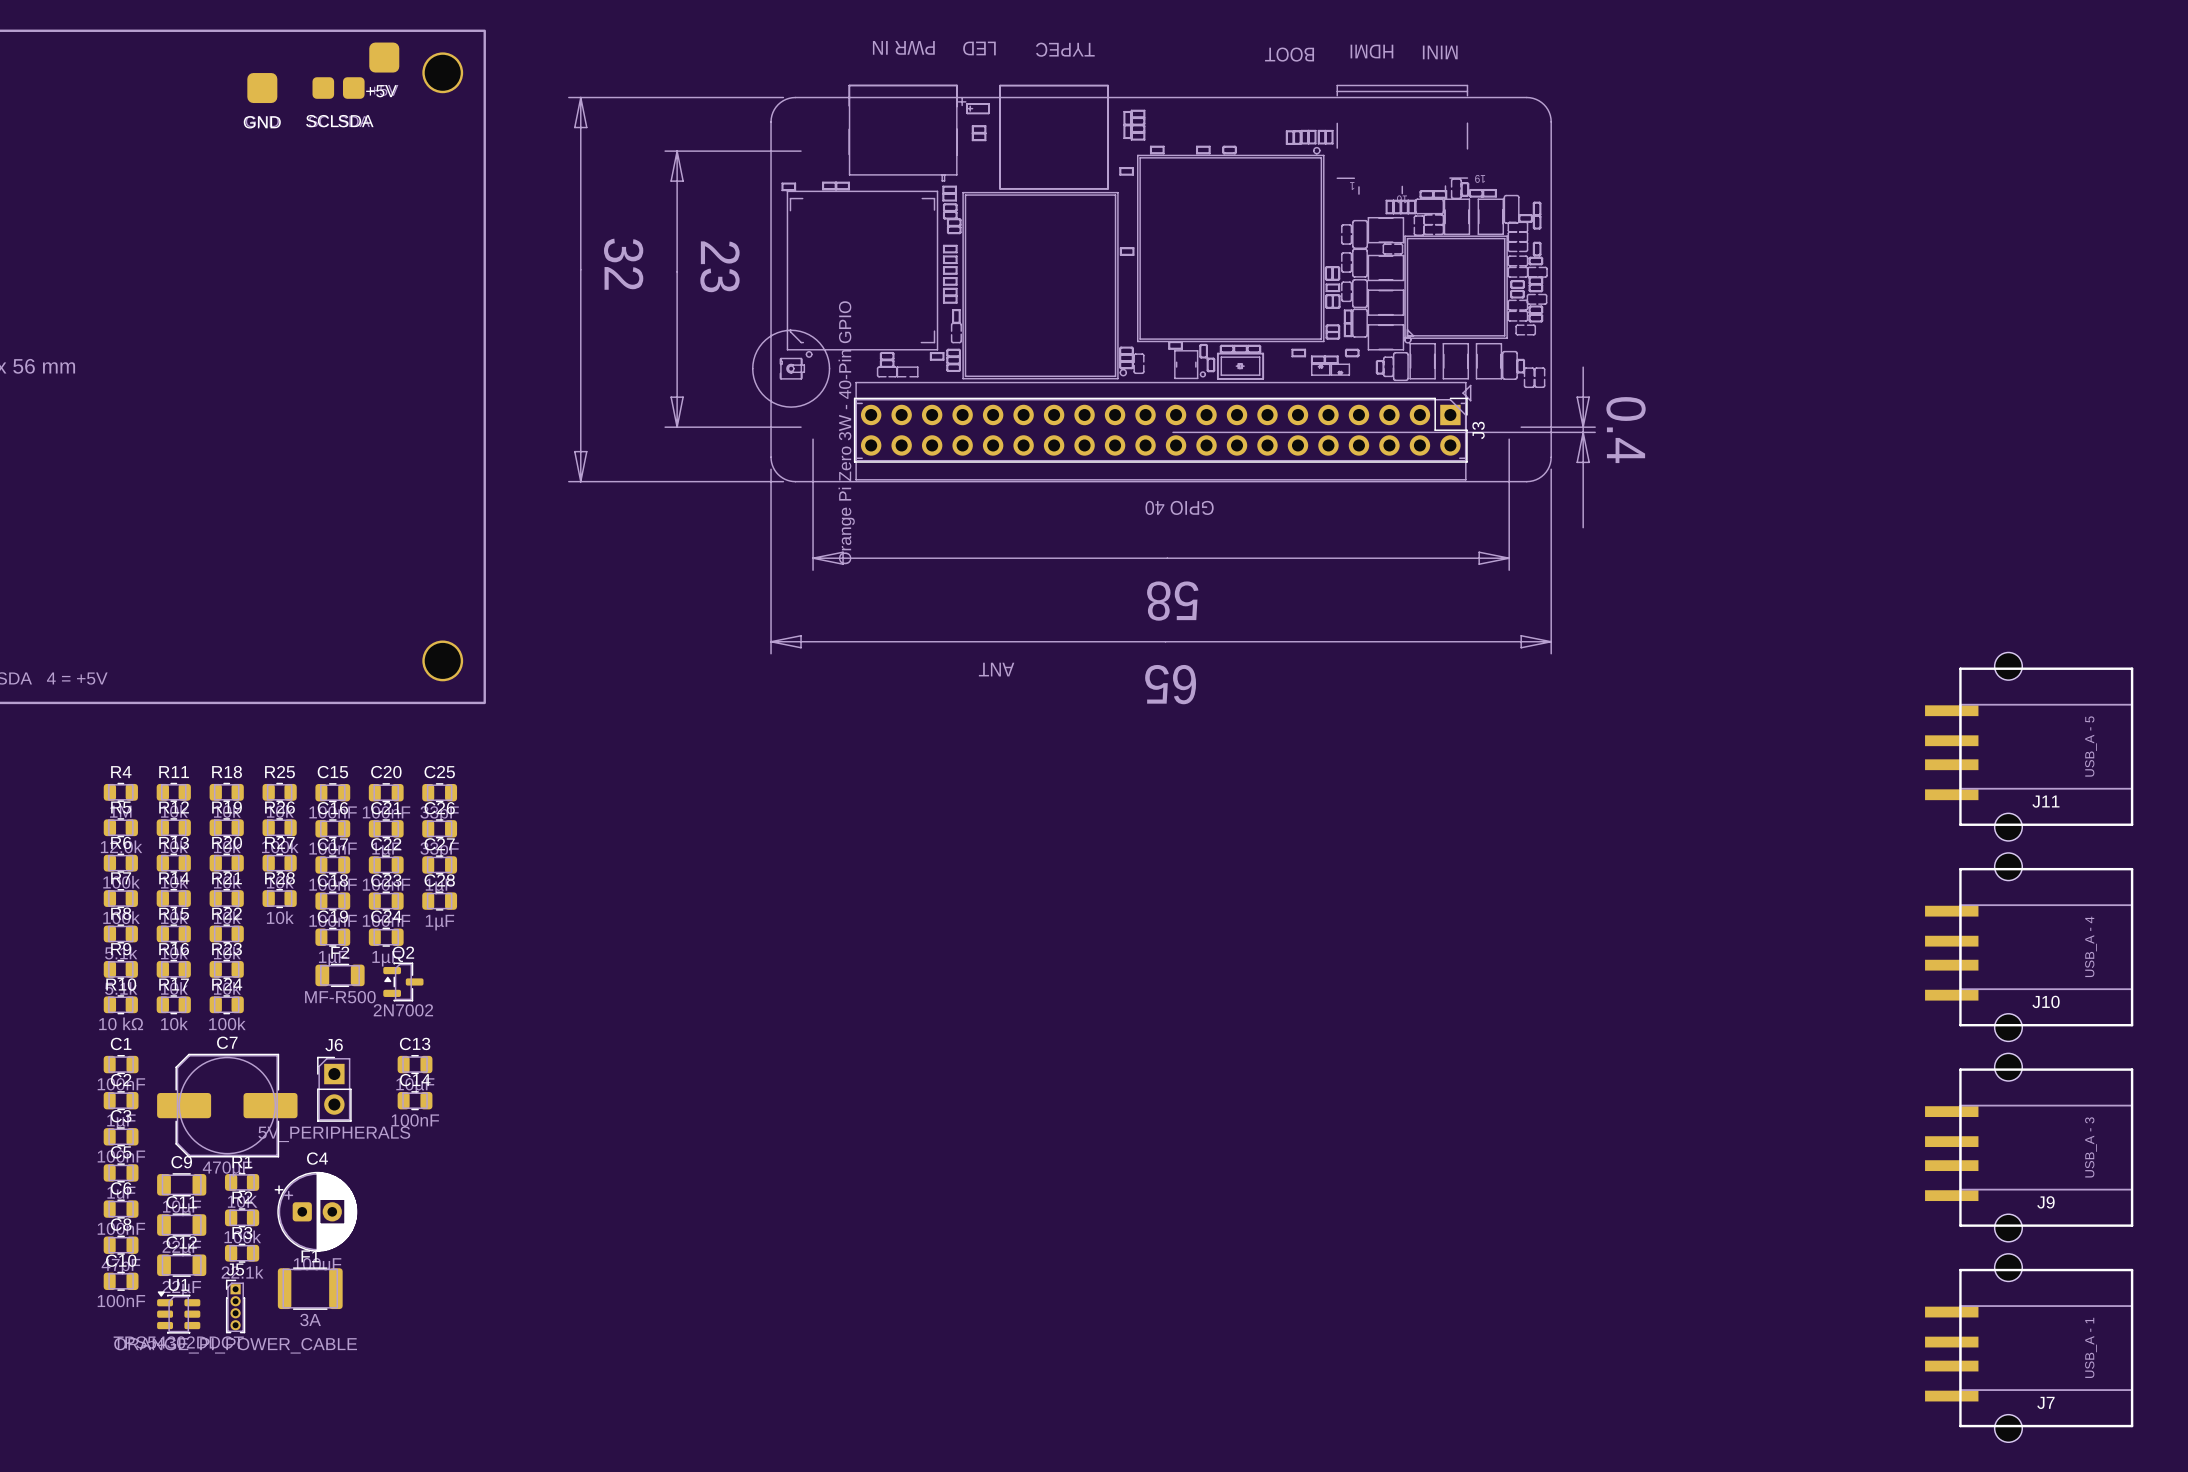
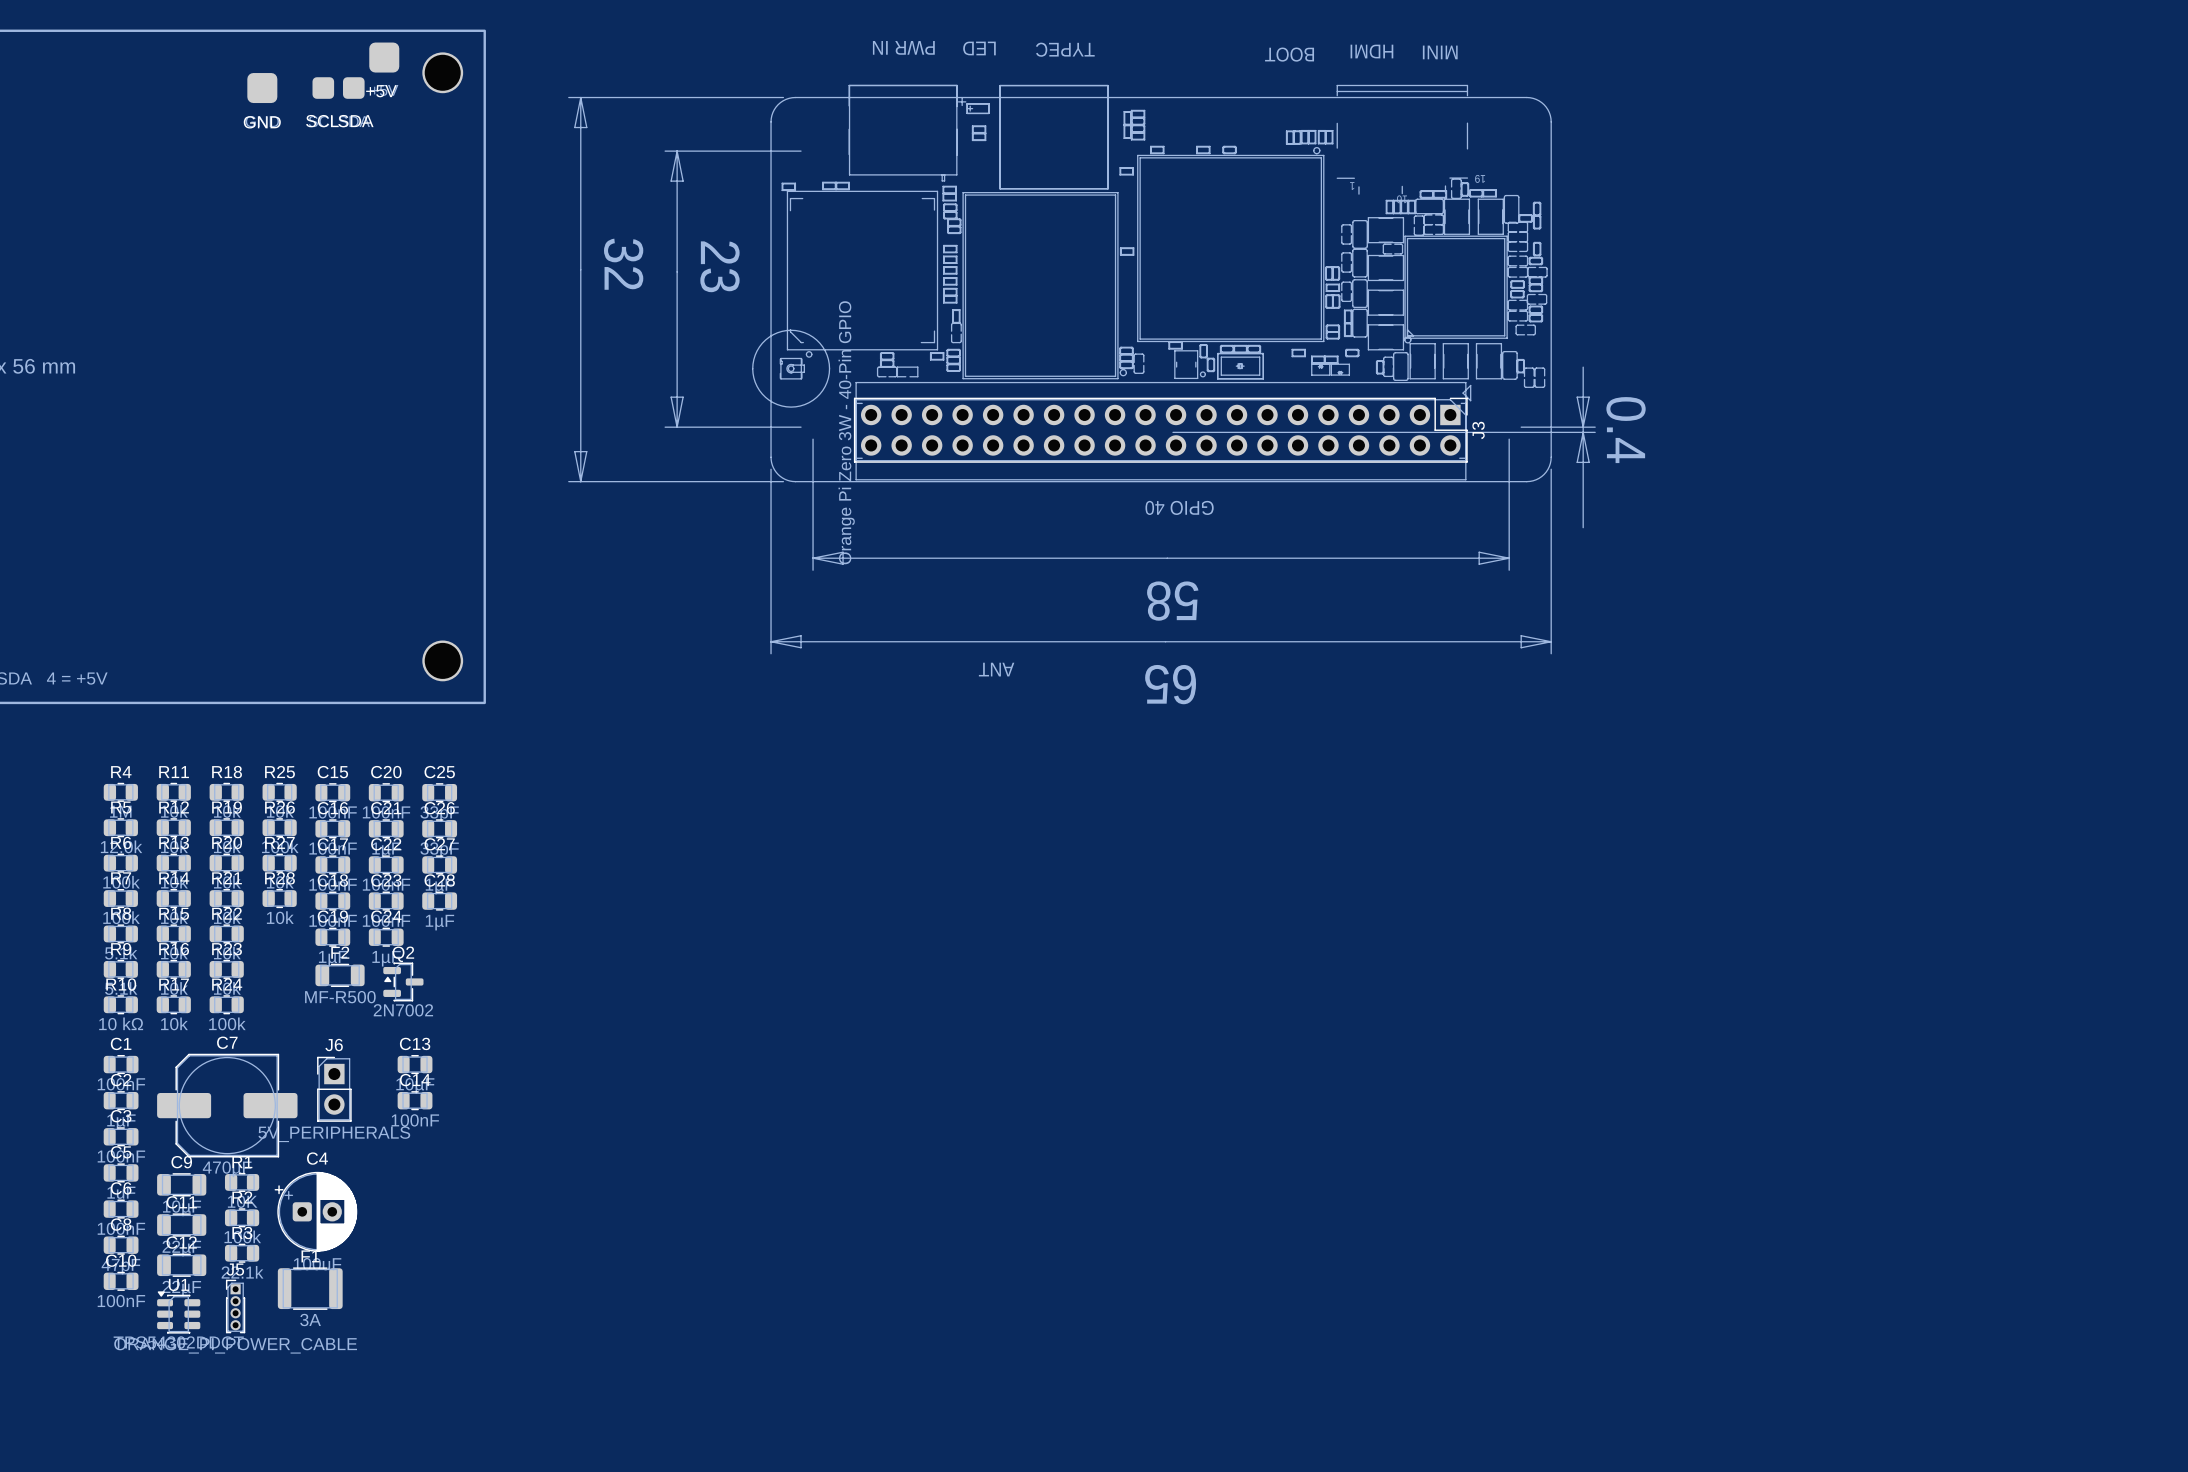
J11: USB_A - 5 (2029, 746) -> none
J10: USB_A - 4 (2029, 947) -> none
J9: USB_A - 3 (2029, 1147) -> none
J7: USB_A - 1 (2029, 1348) -> none

